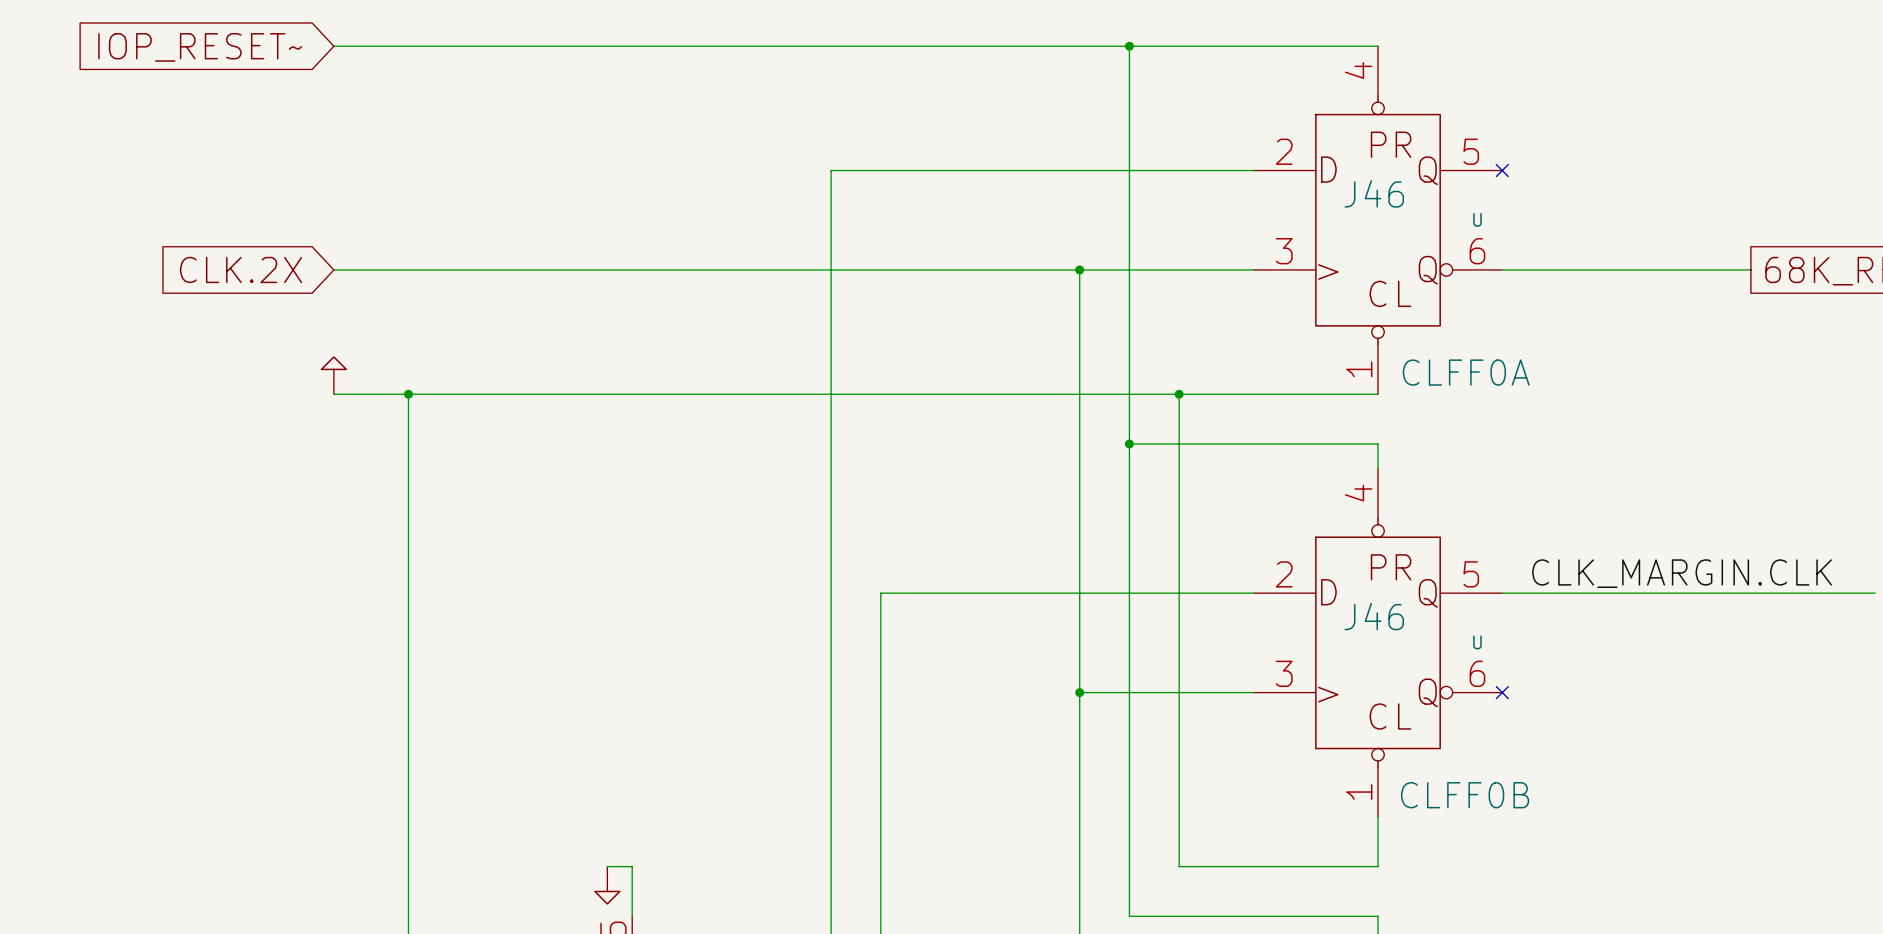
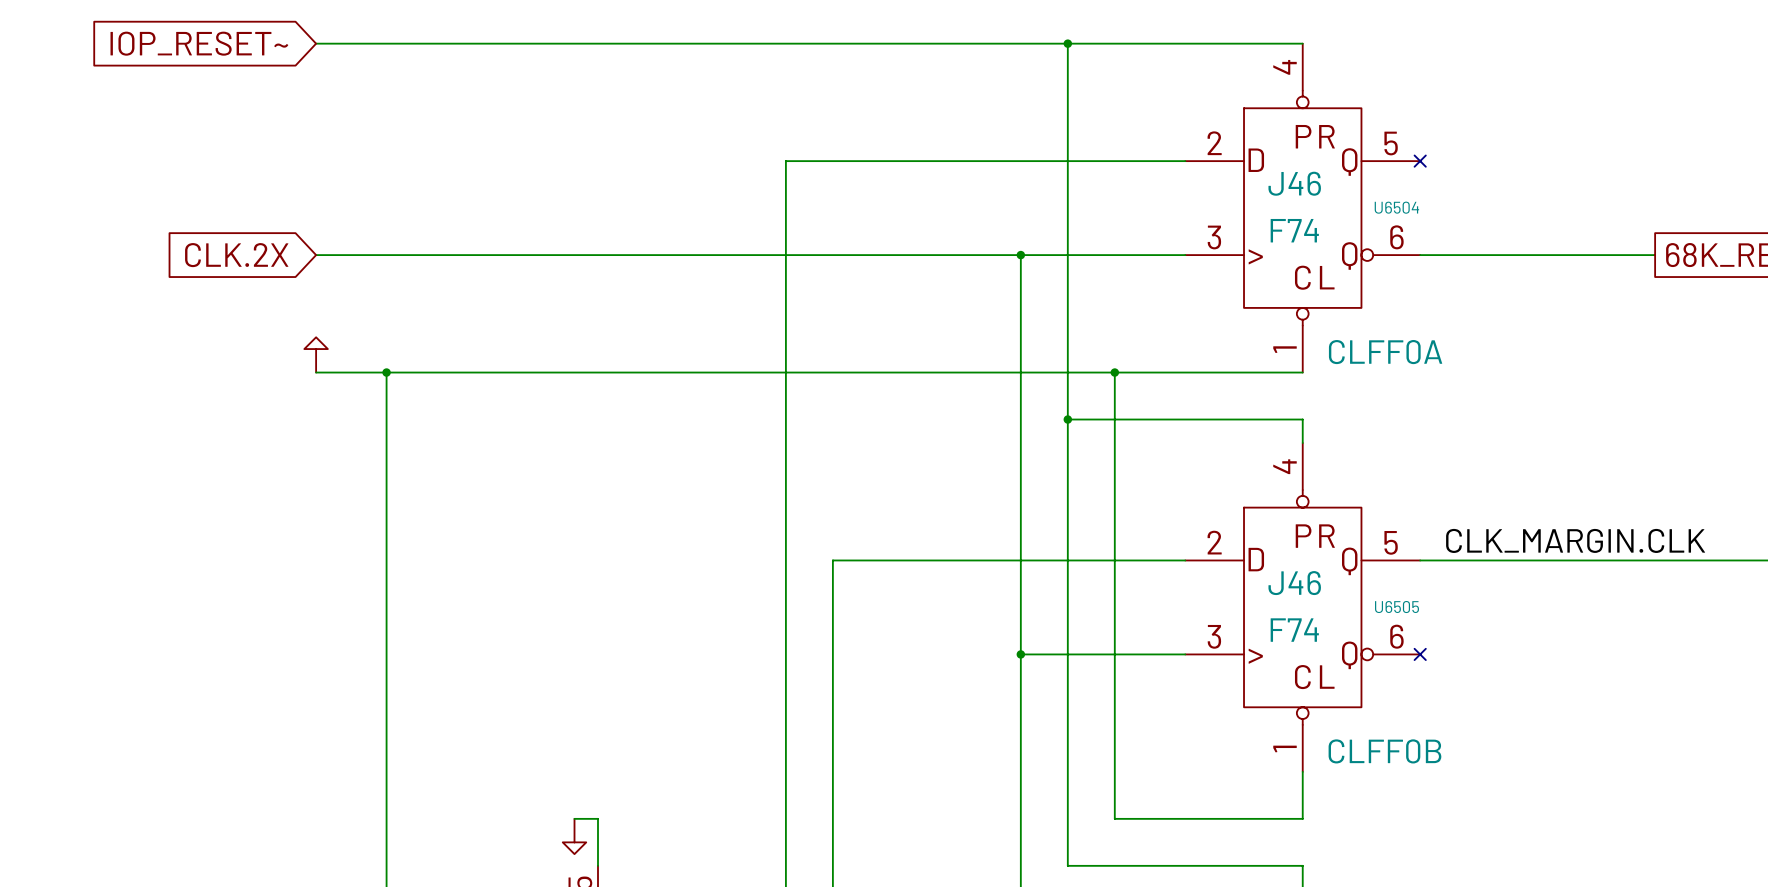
U name: U (1477, 219) -> U6504 (1396, 207)
U value: none -> F74 (1294, 230)
U name: U (1477, 642) -> U6505 (1397, 607)
U value: none -> F74 (1294, 630)

